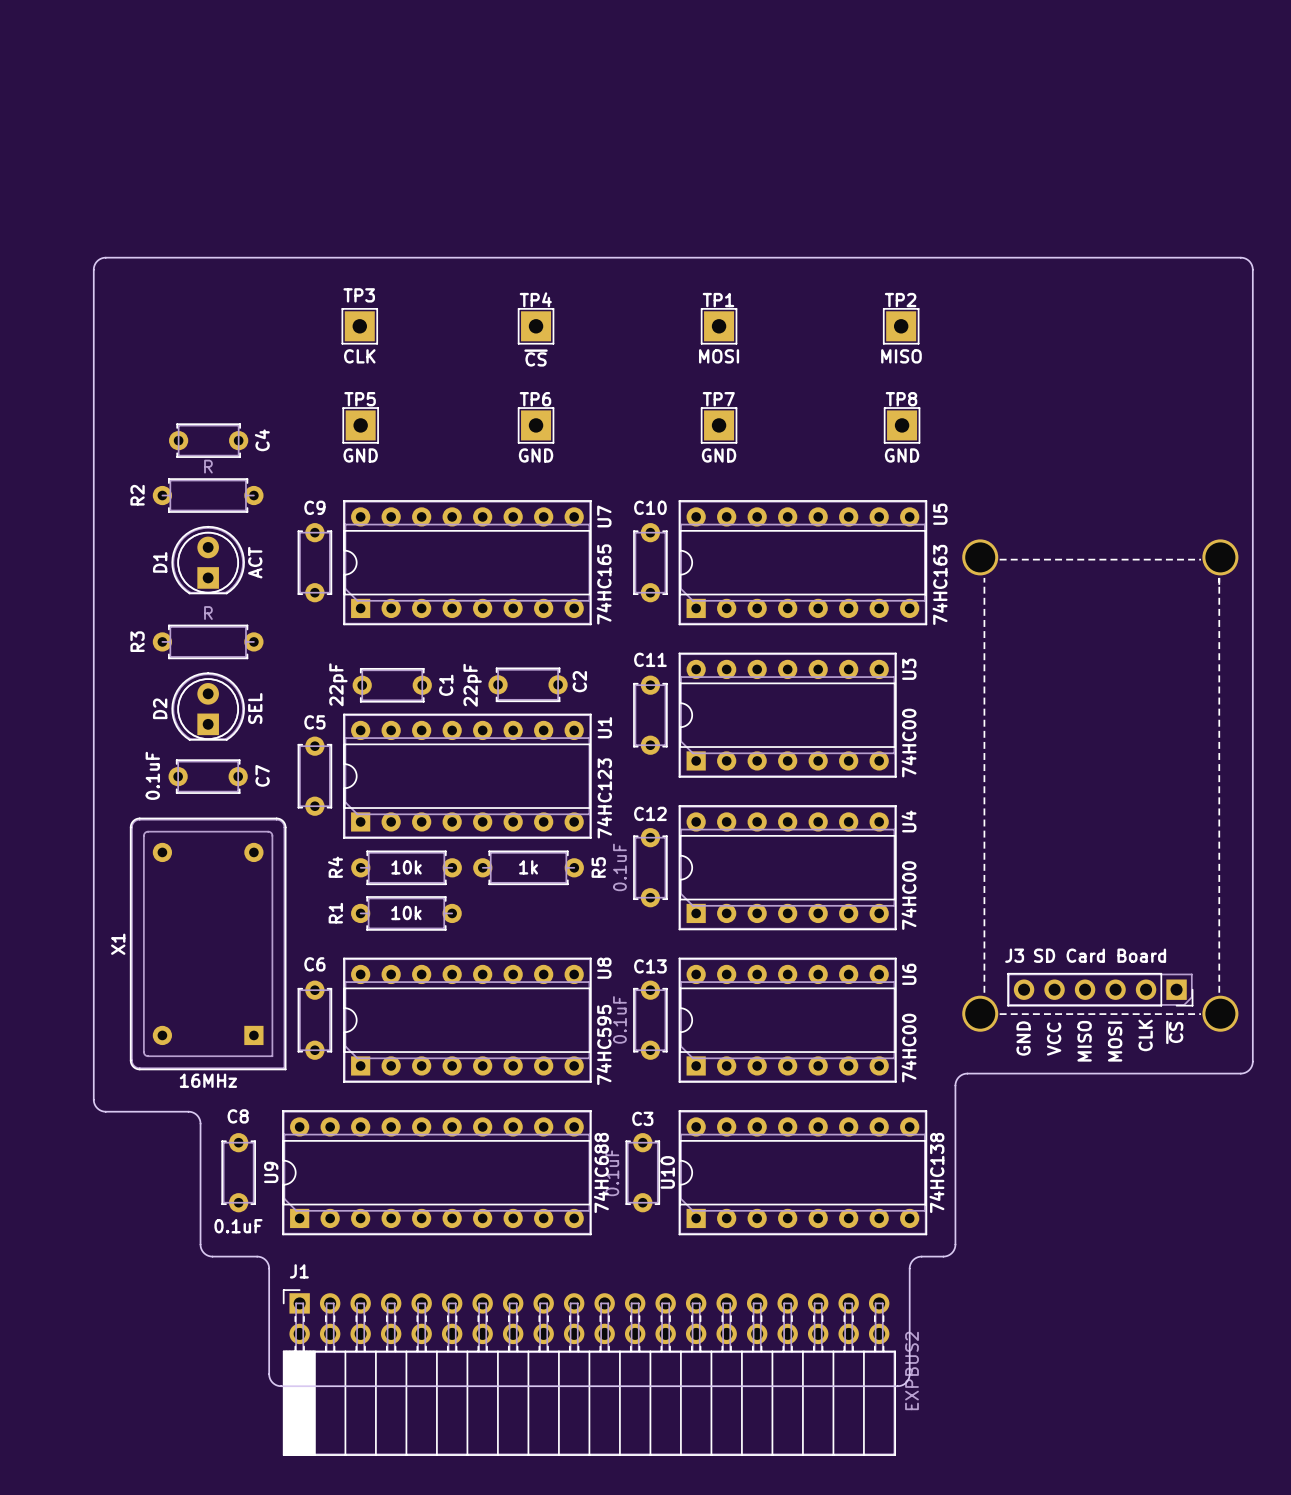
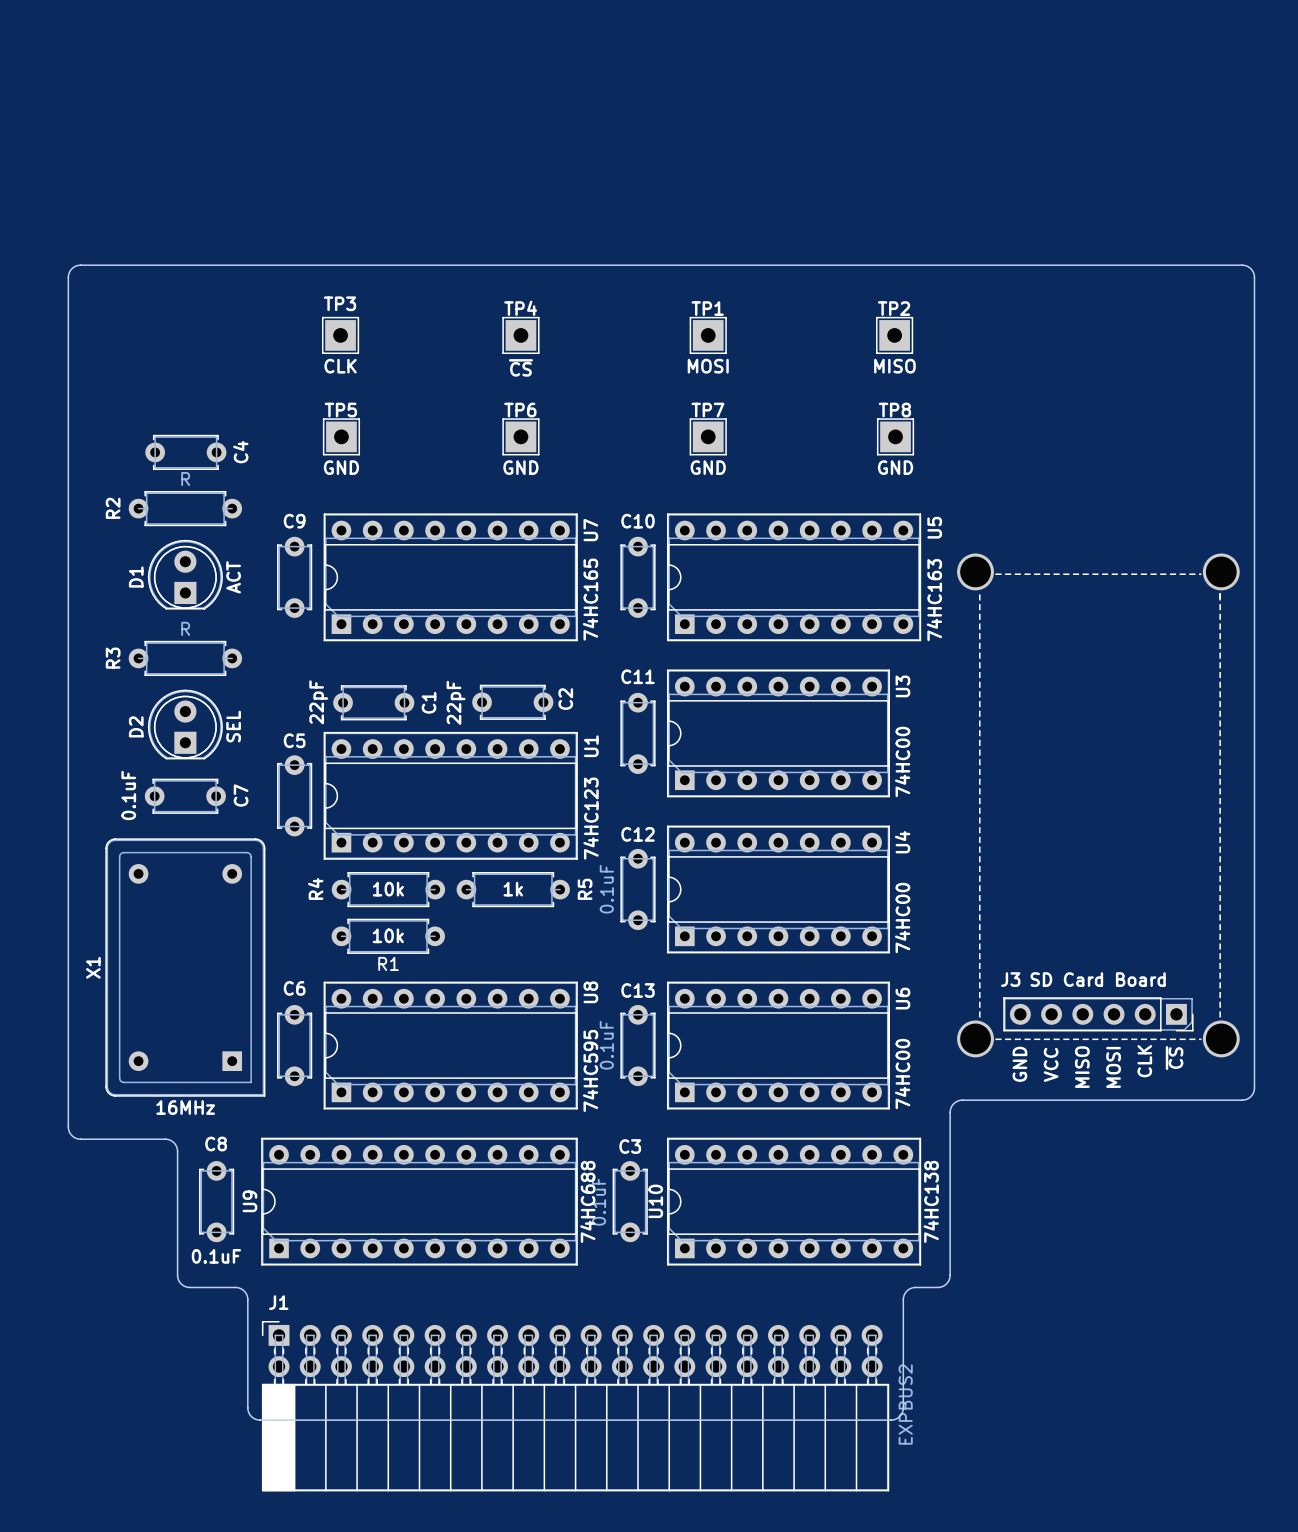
R1 name rotation: 0° (335, 913) -> 90° clockwise (388, 963)
R1 name position: R1 (335, 913) -> R1 (388, 963)

